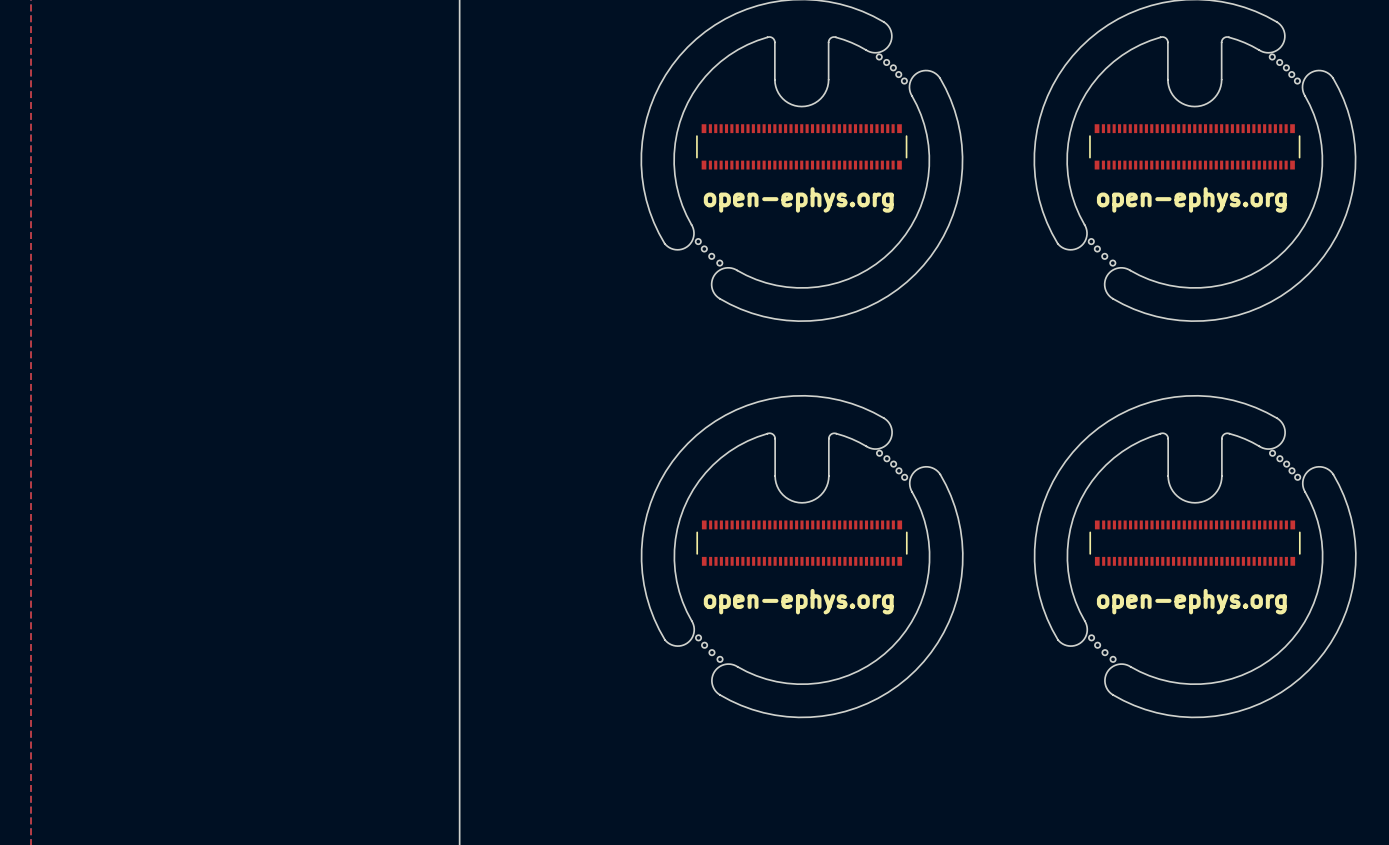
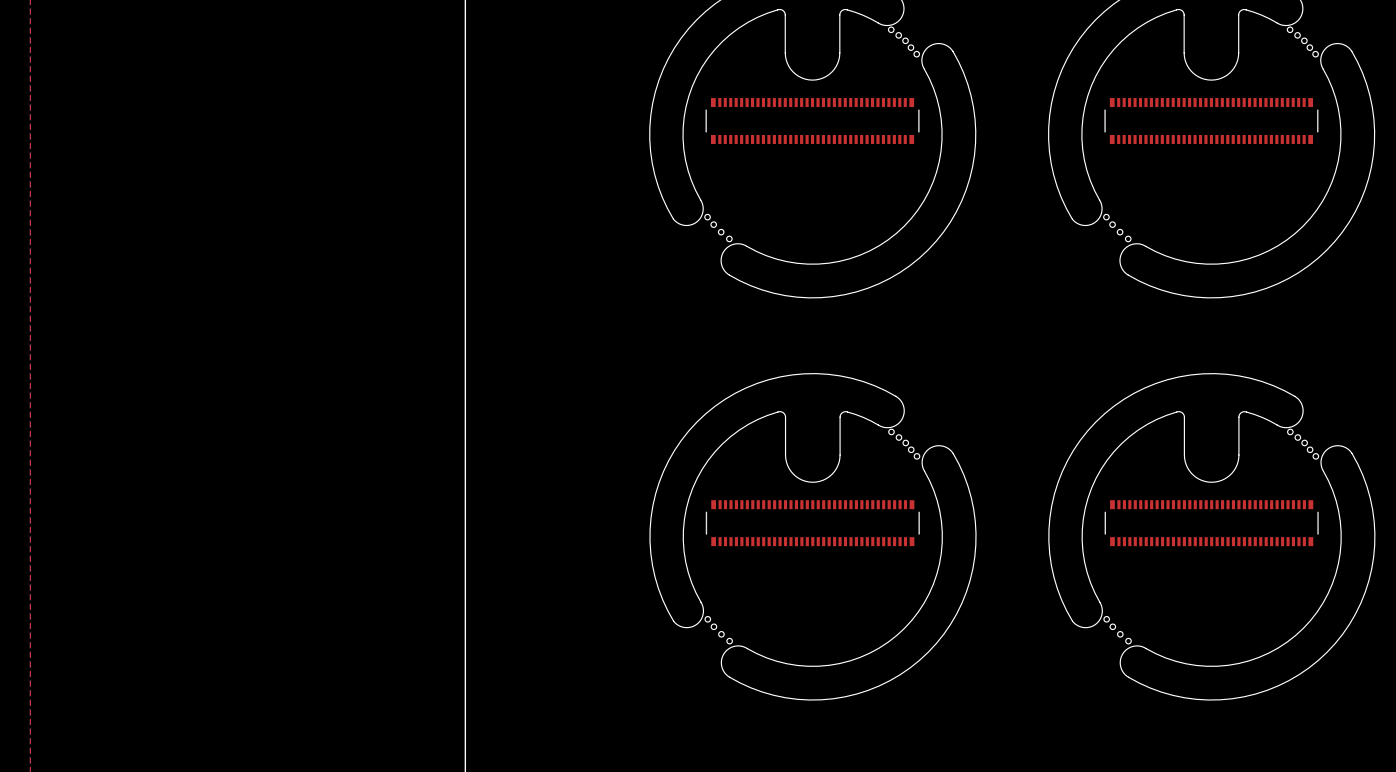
text: open-ephys.org (798, 199) -> none
text: open-ephys.org (1191, 199) -> none
text: open-ephys.org (798, 601) -> none
text: open-ephys.org (1191, 601) -> none

